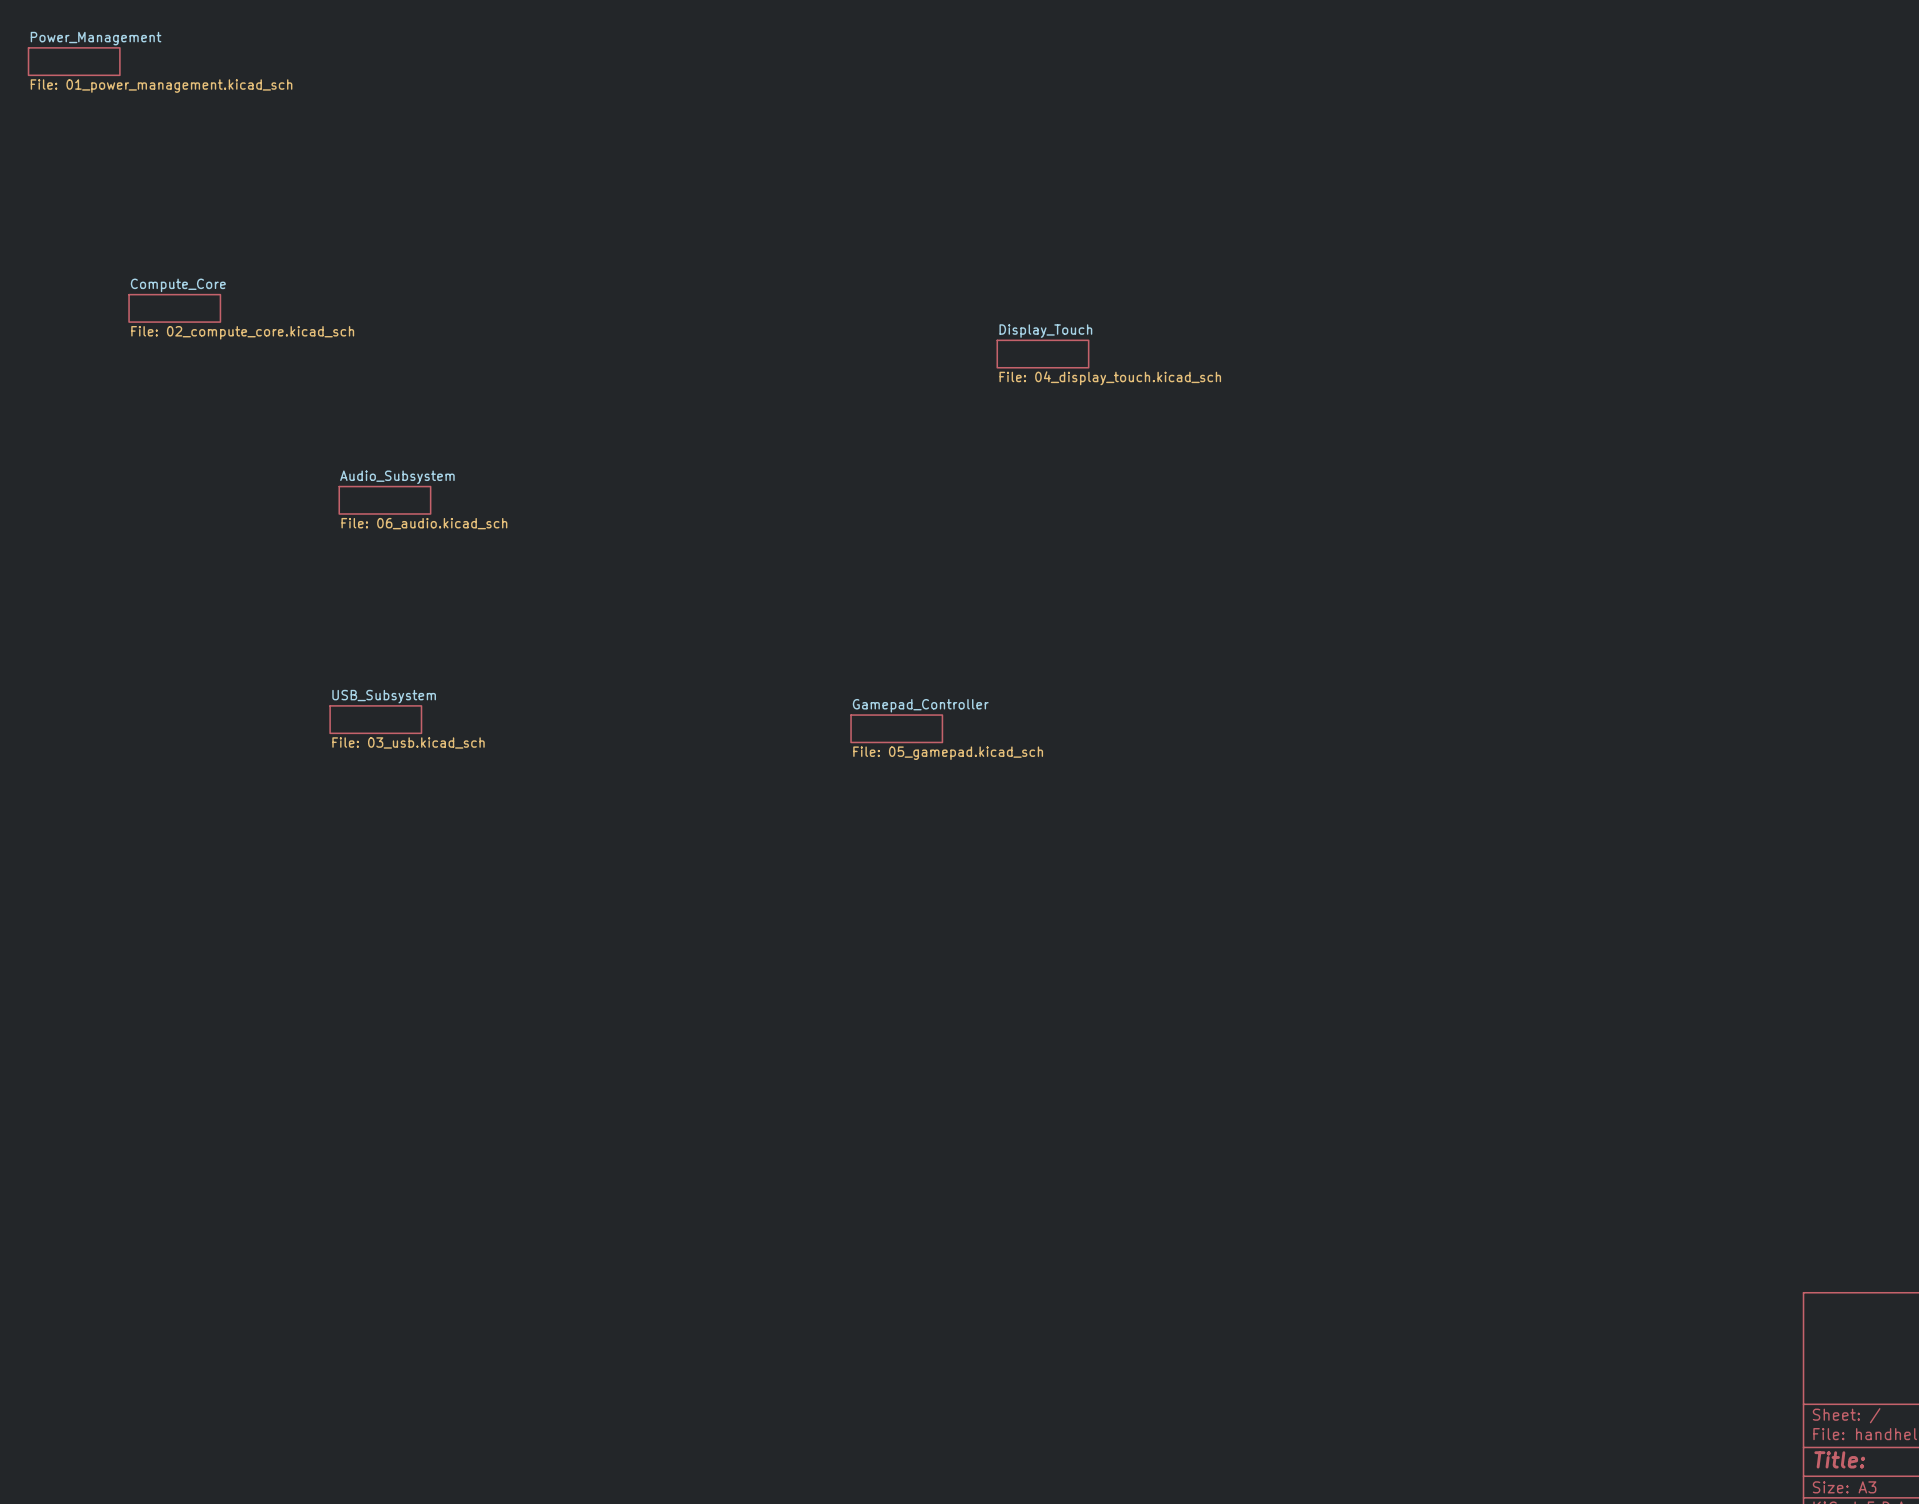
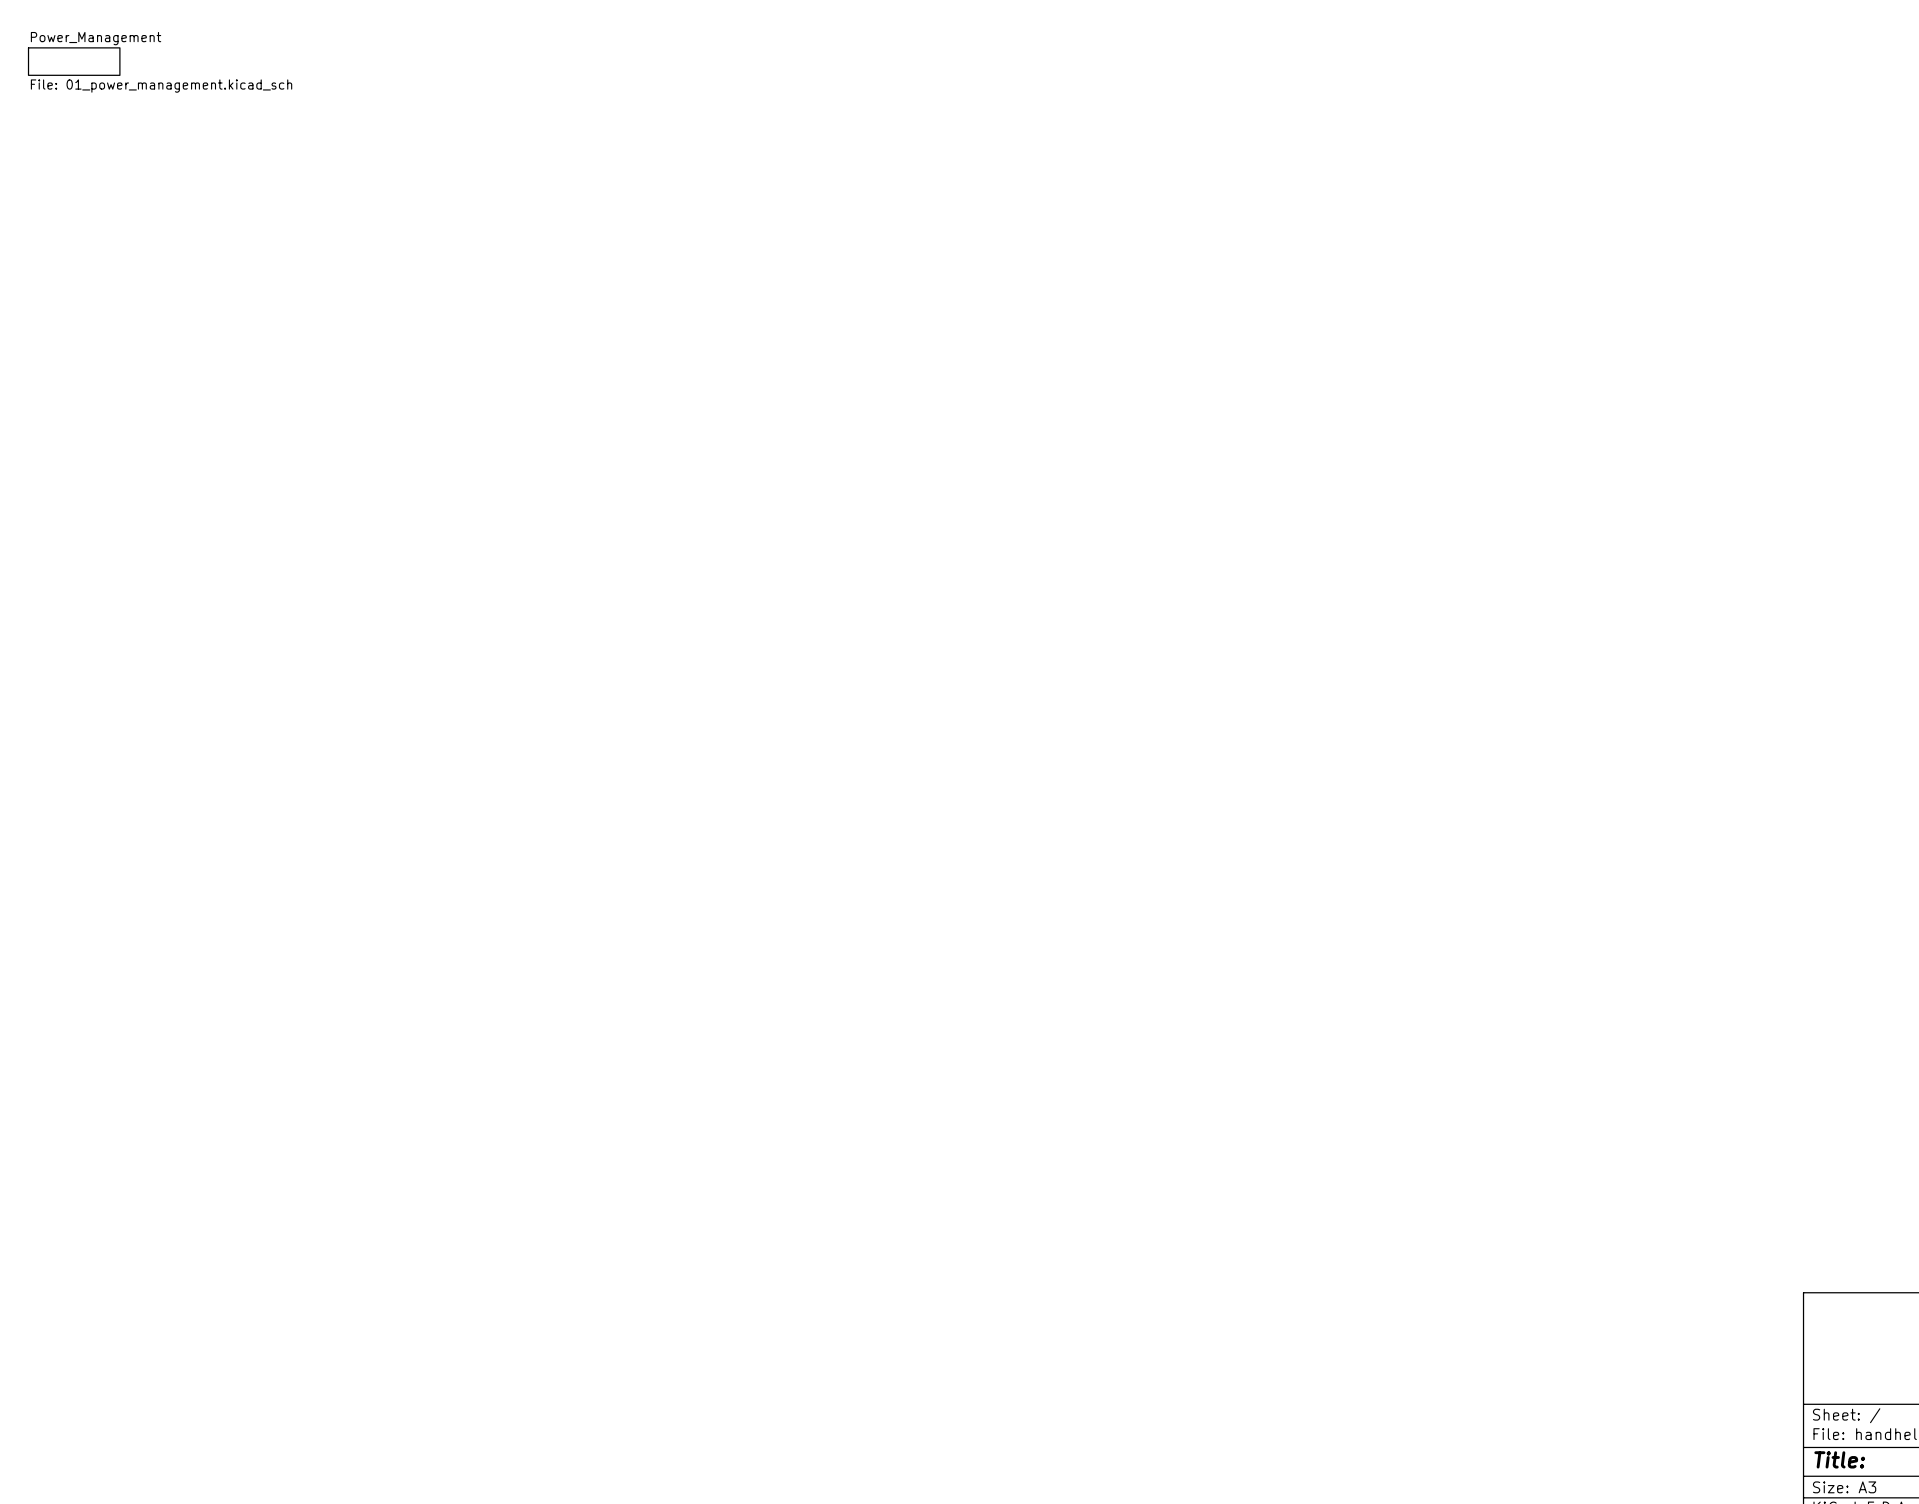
sheet Compute_Core: File: 02_compute_core.kicad_sch (174, 308) -> none
sheet Display_Touch: File: 04_display_touch.kicad_sch (1042, 354) -> none
sheet Audio_Subsystem: File: 06_audio.kicad_sch (384, 500) -> none
sheet USB_Subsystem: File: 03_usb.kicad_sch (375, 719) -> none
sheet Gamepad_Controller: File: 05_gamepad.kicad_sch (896, 728) -> none

